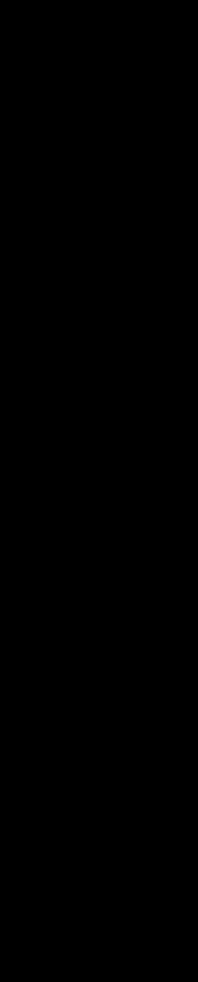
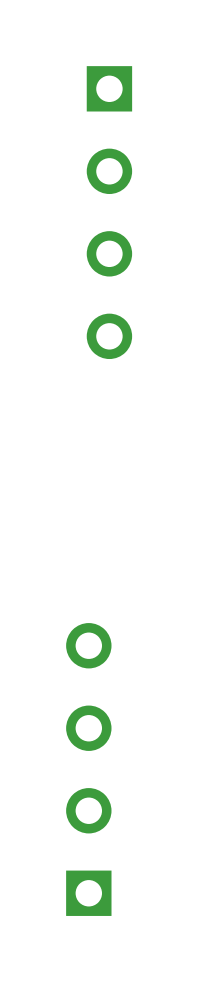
part: none -> (109, 212)
part: none -> (88, 769)

